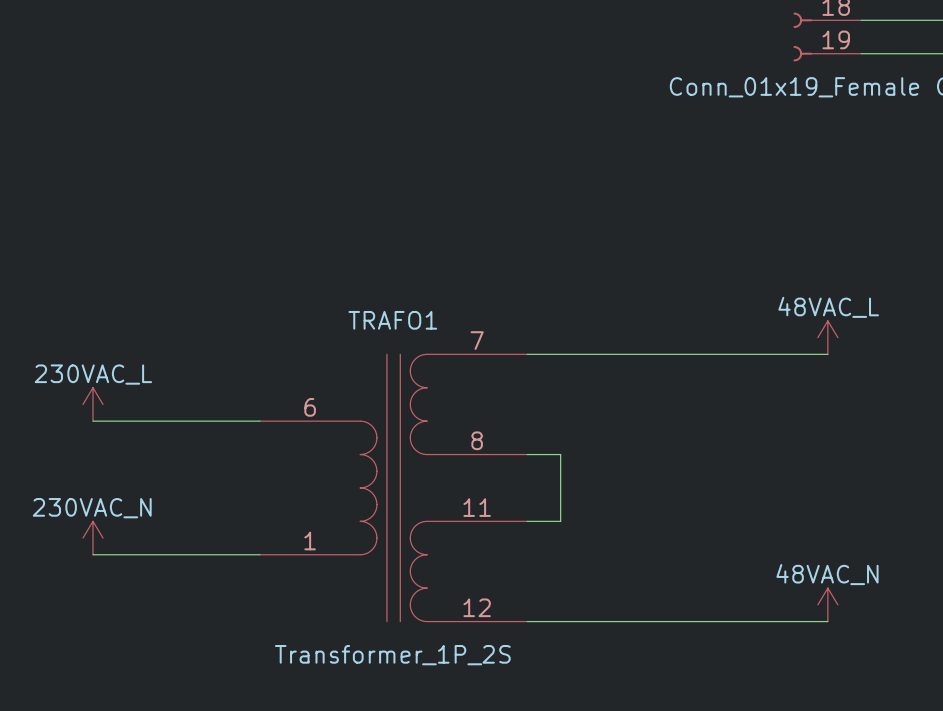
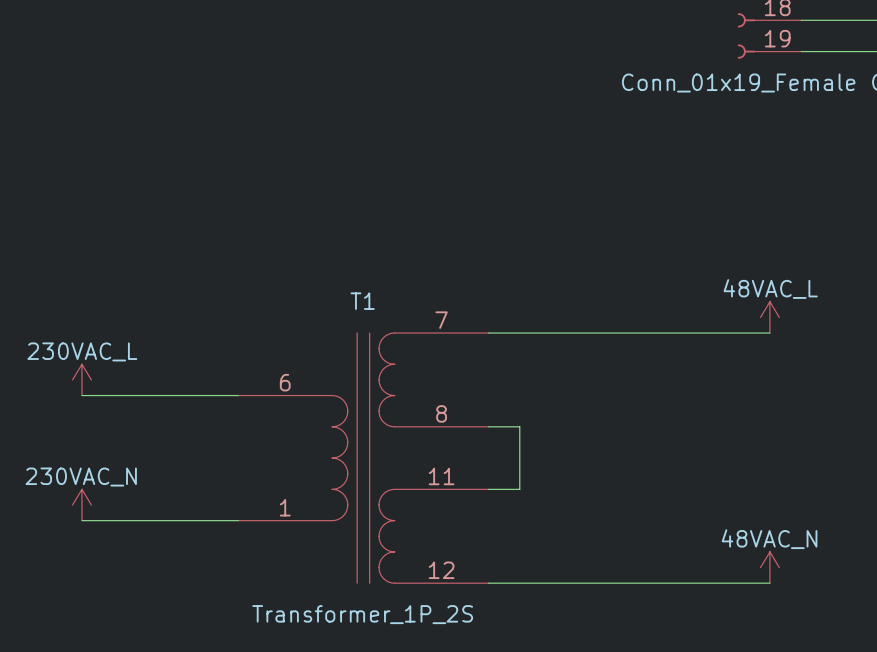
TRAFO1 name: TRAFO1 (392, 320) -> T1 (362, 301)

